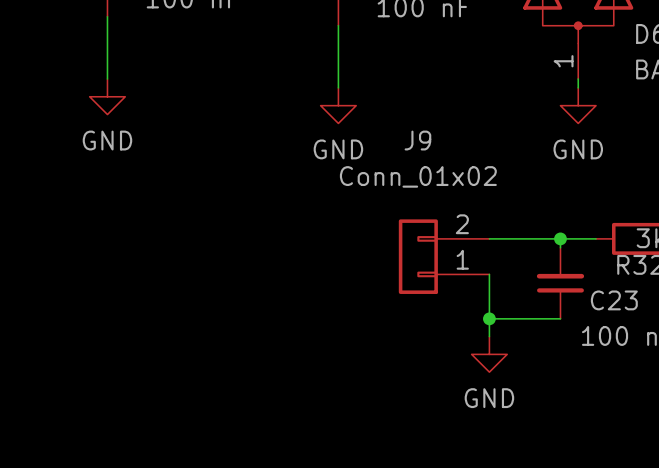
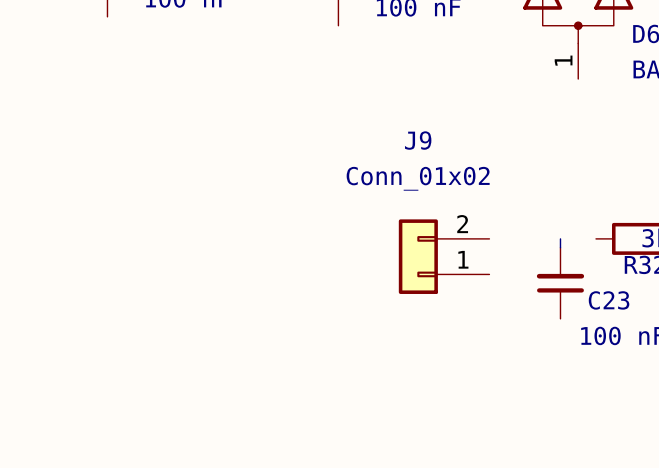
wire: (107, 16) (107, 79) -> none
wire: (338, 25) (338, 87) -> none
wire: (578, 79) (578, 87) -> none
power symbol: GND (107, 96) -> none
power symbol: GND (338, 105) -> none
power symbol: GND (578, 105) -> none
wire: (489, 238) (596, 238) -> none
junction: (560, 238) -> none
wire: (489, 274) (489, 336) -> none
wire: (489, 318) (560, 318) -> none
junction: (489, 318) -> none
power symbol: GND (489, 354) -> none

